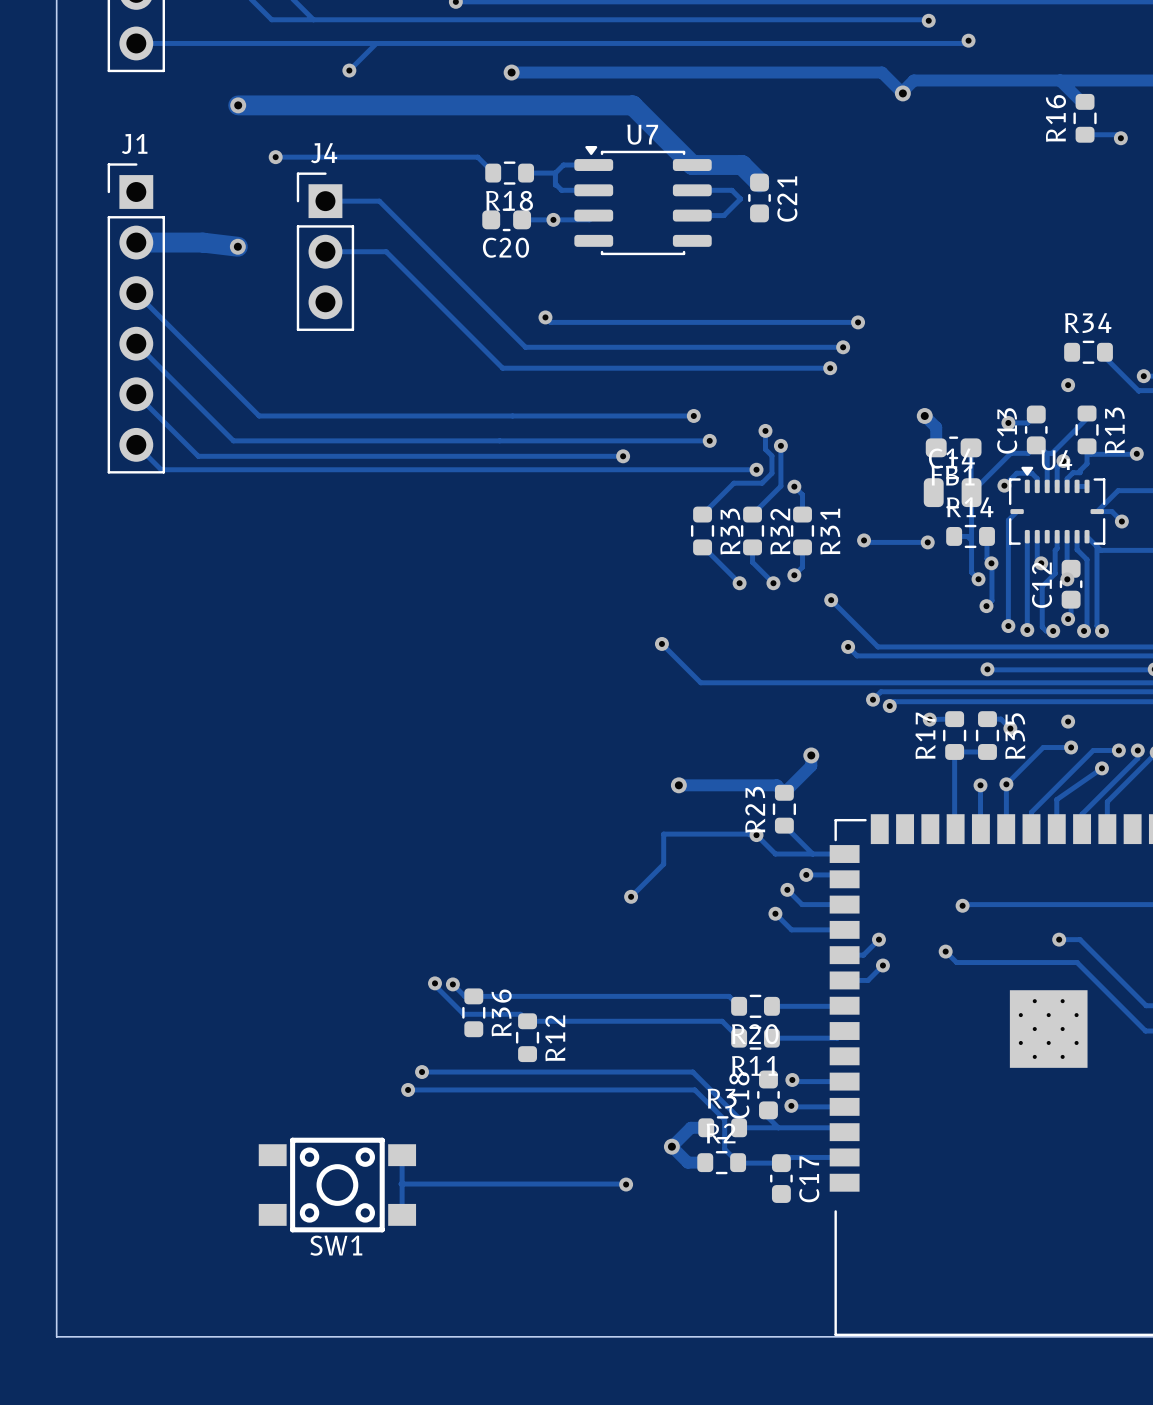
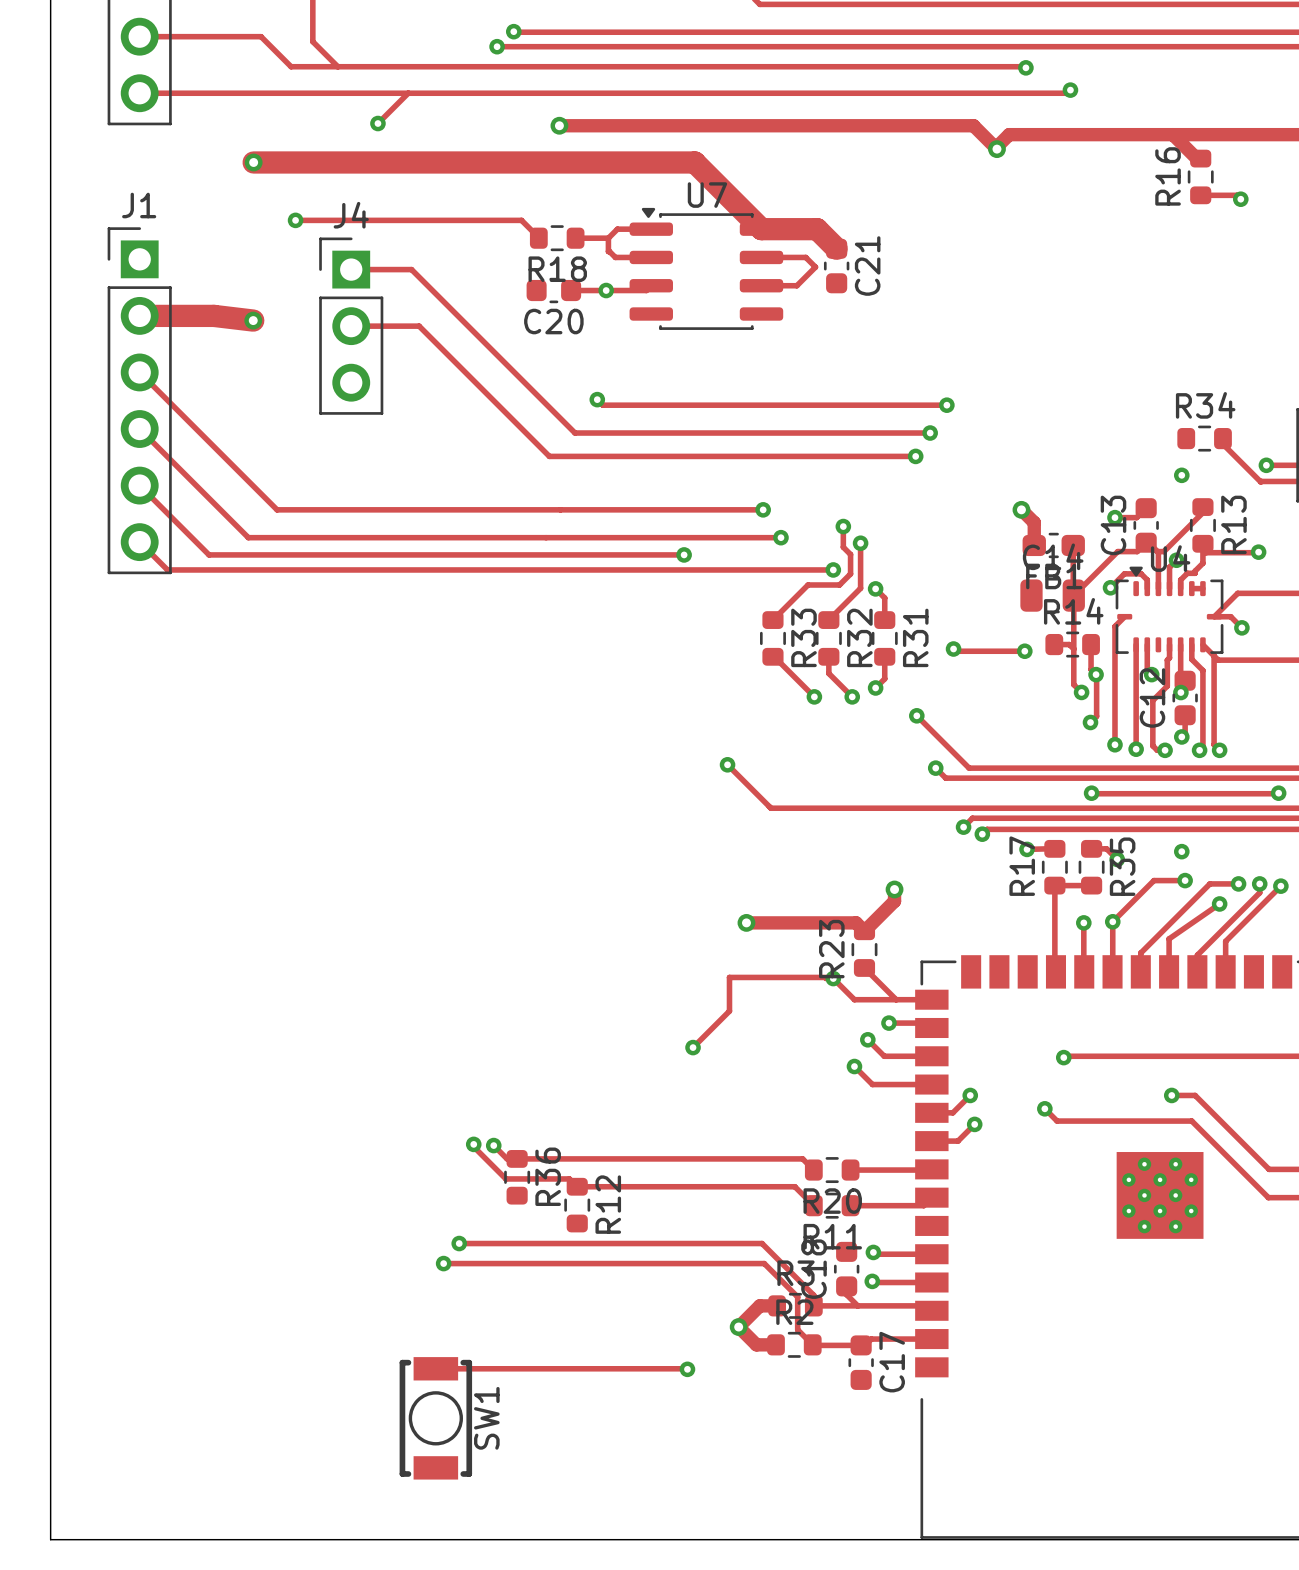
SW1 footprint: [258, 1137, 417, 1233] -> [399, 1357, 473, 1480]
track: (402, 1155) (402, 1214) -> none
SW1 name position: SW1 (336, 1245) -> SW1 (486, 1418)

